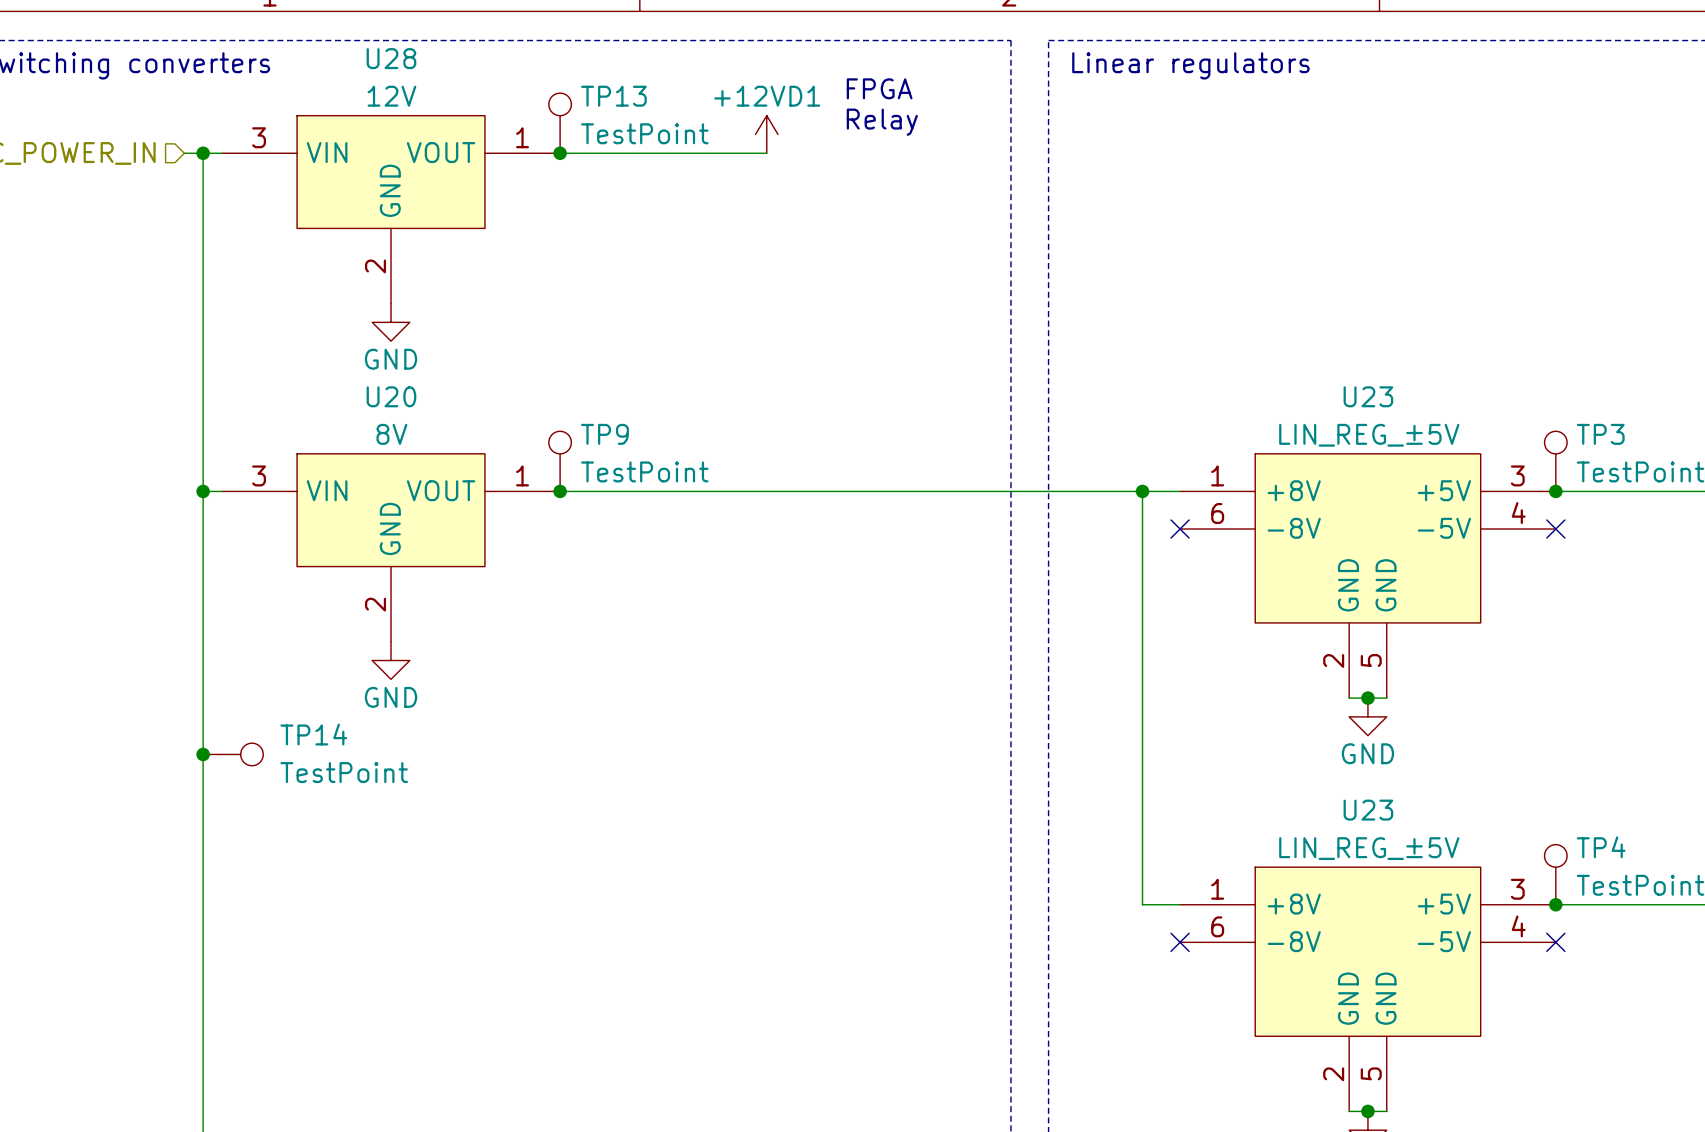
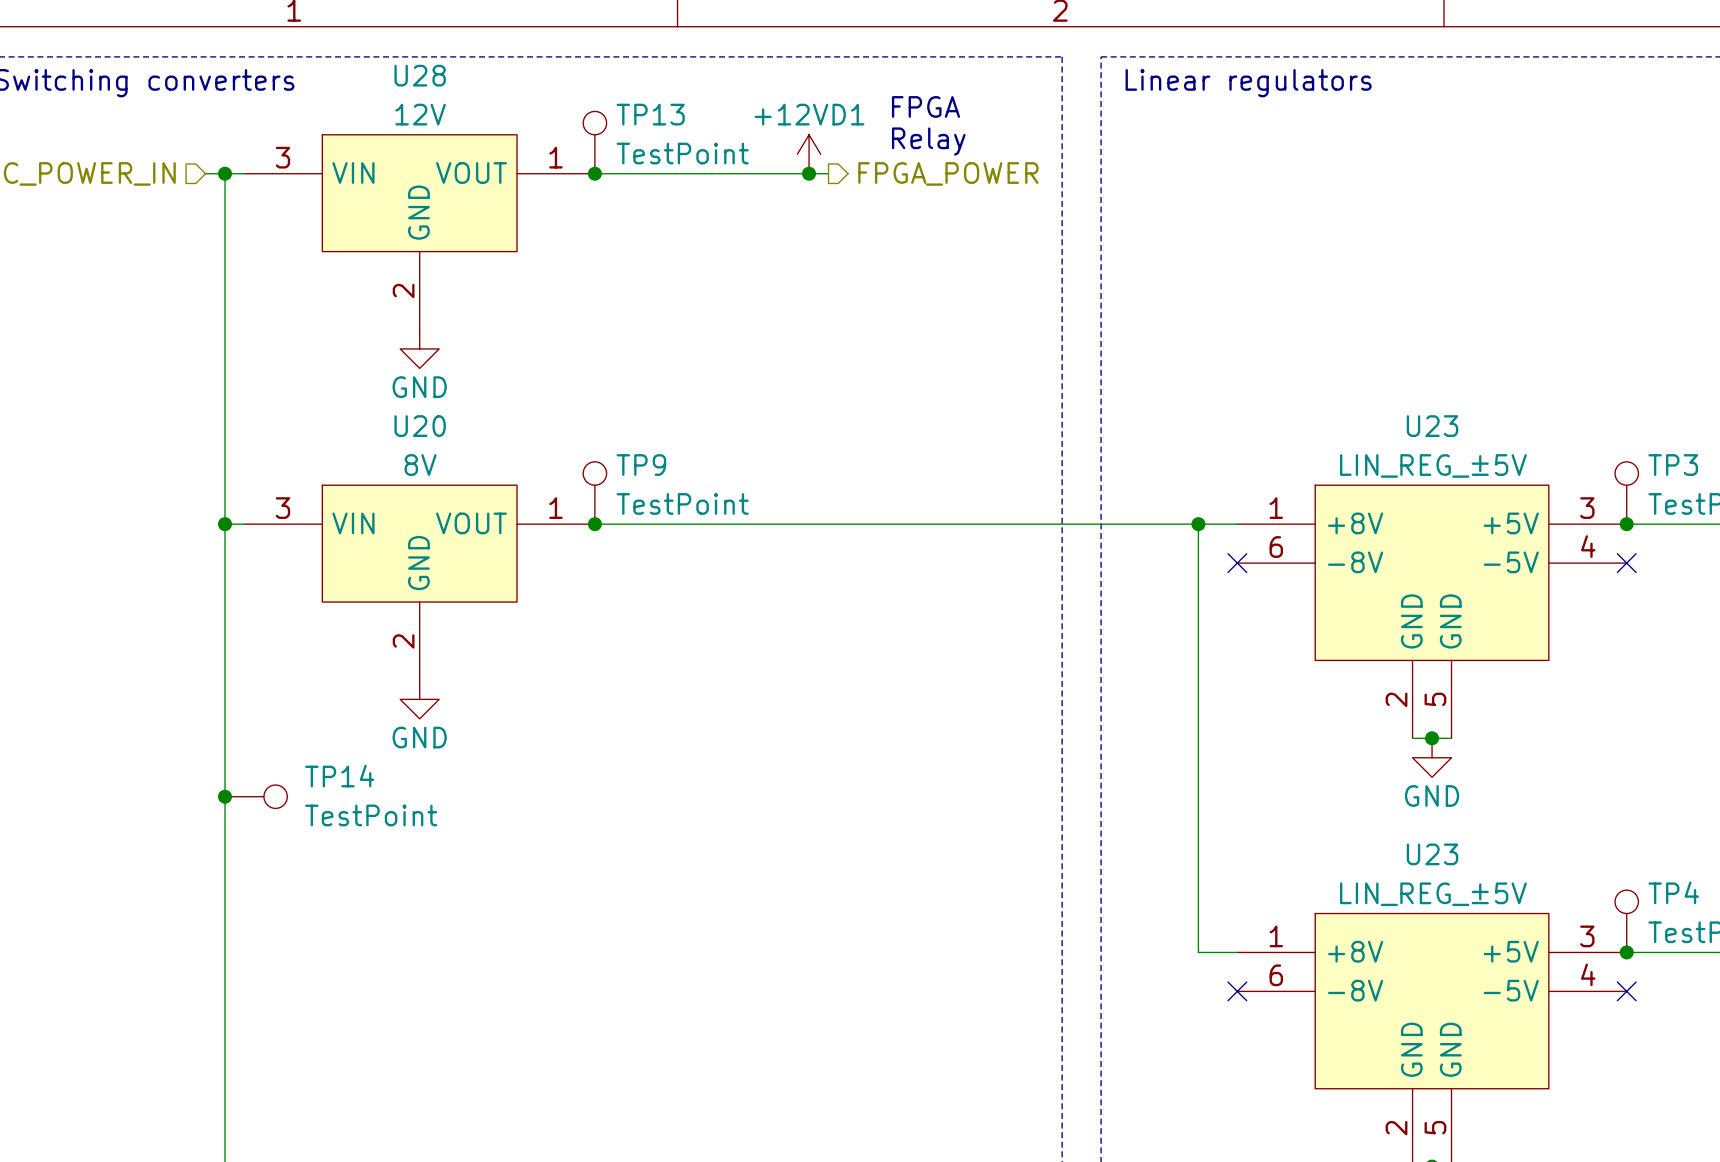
wire: none -> (809, 173) (828, 173)
junction: none -> (809, 173)
hierarchical label: none -> FPGA_POWER (948, 173)

